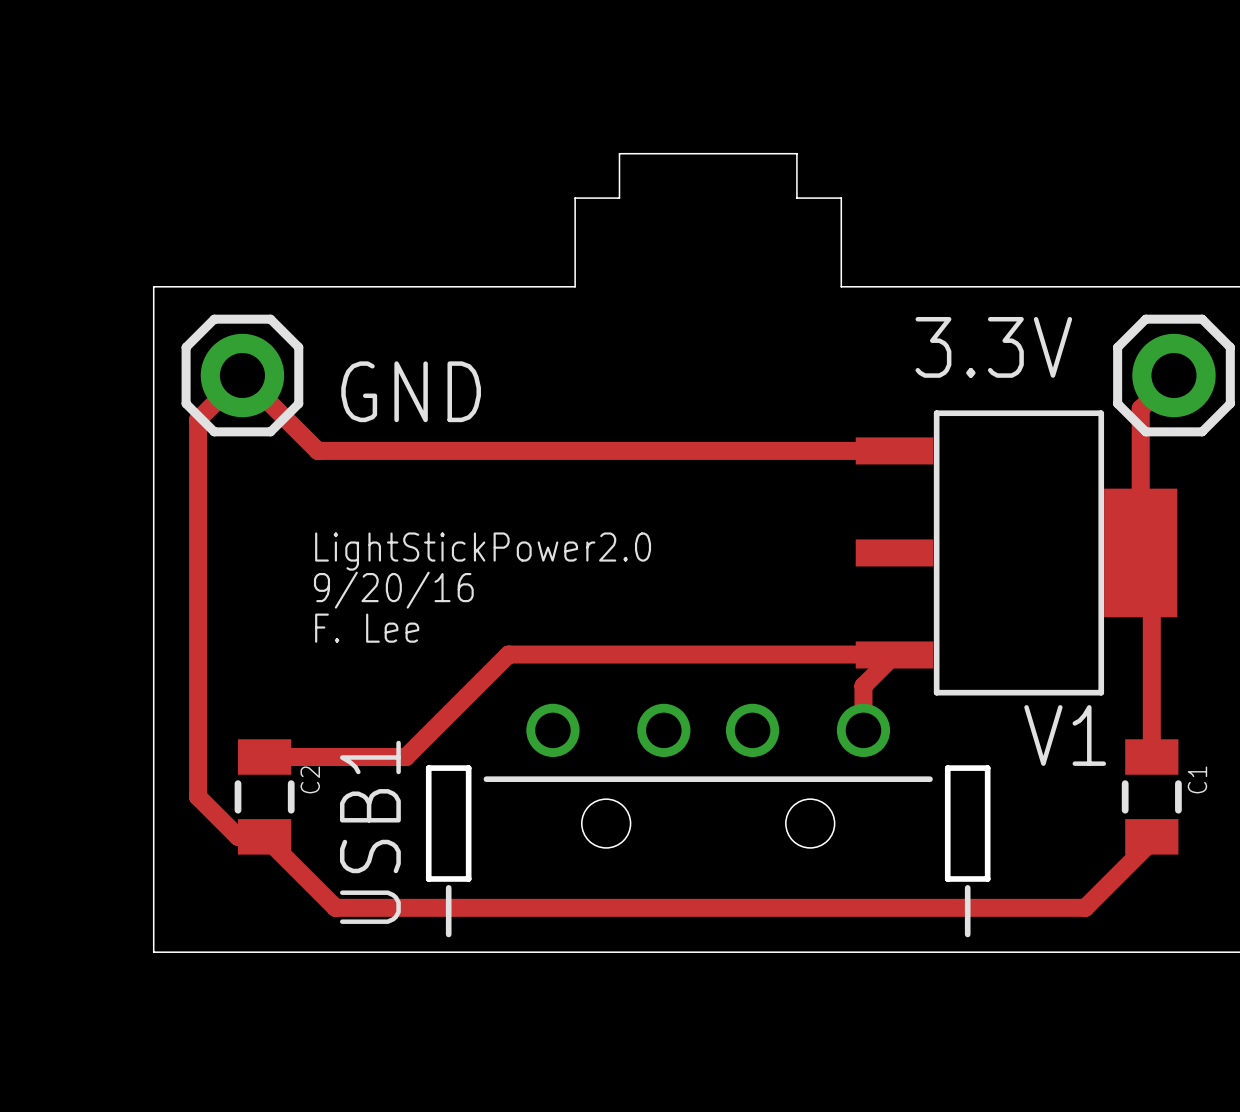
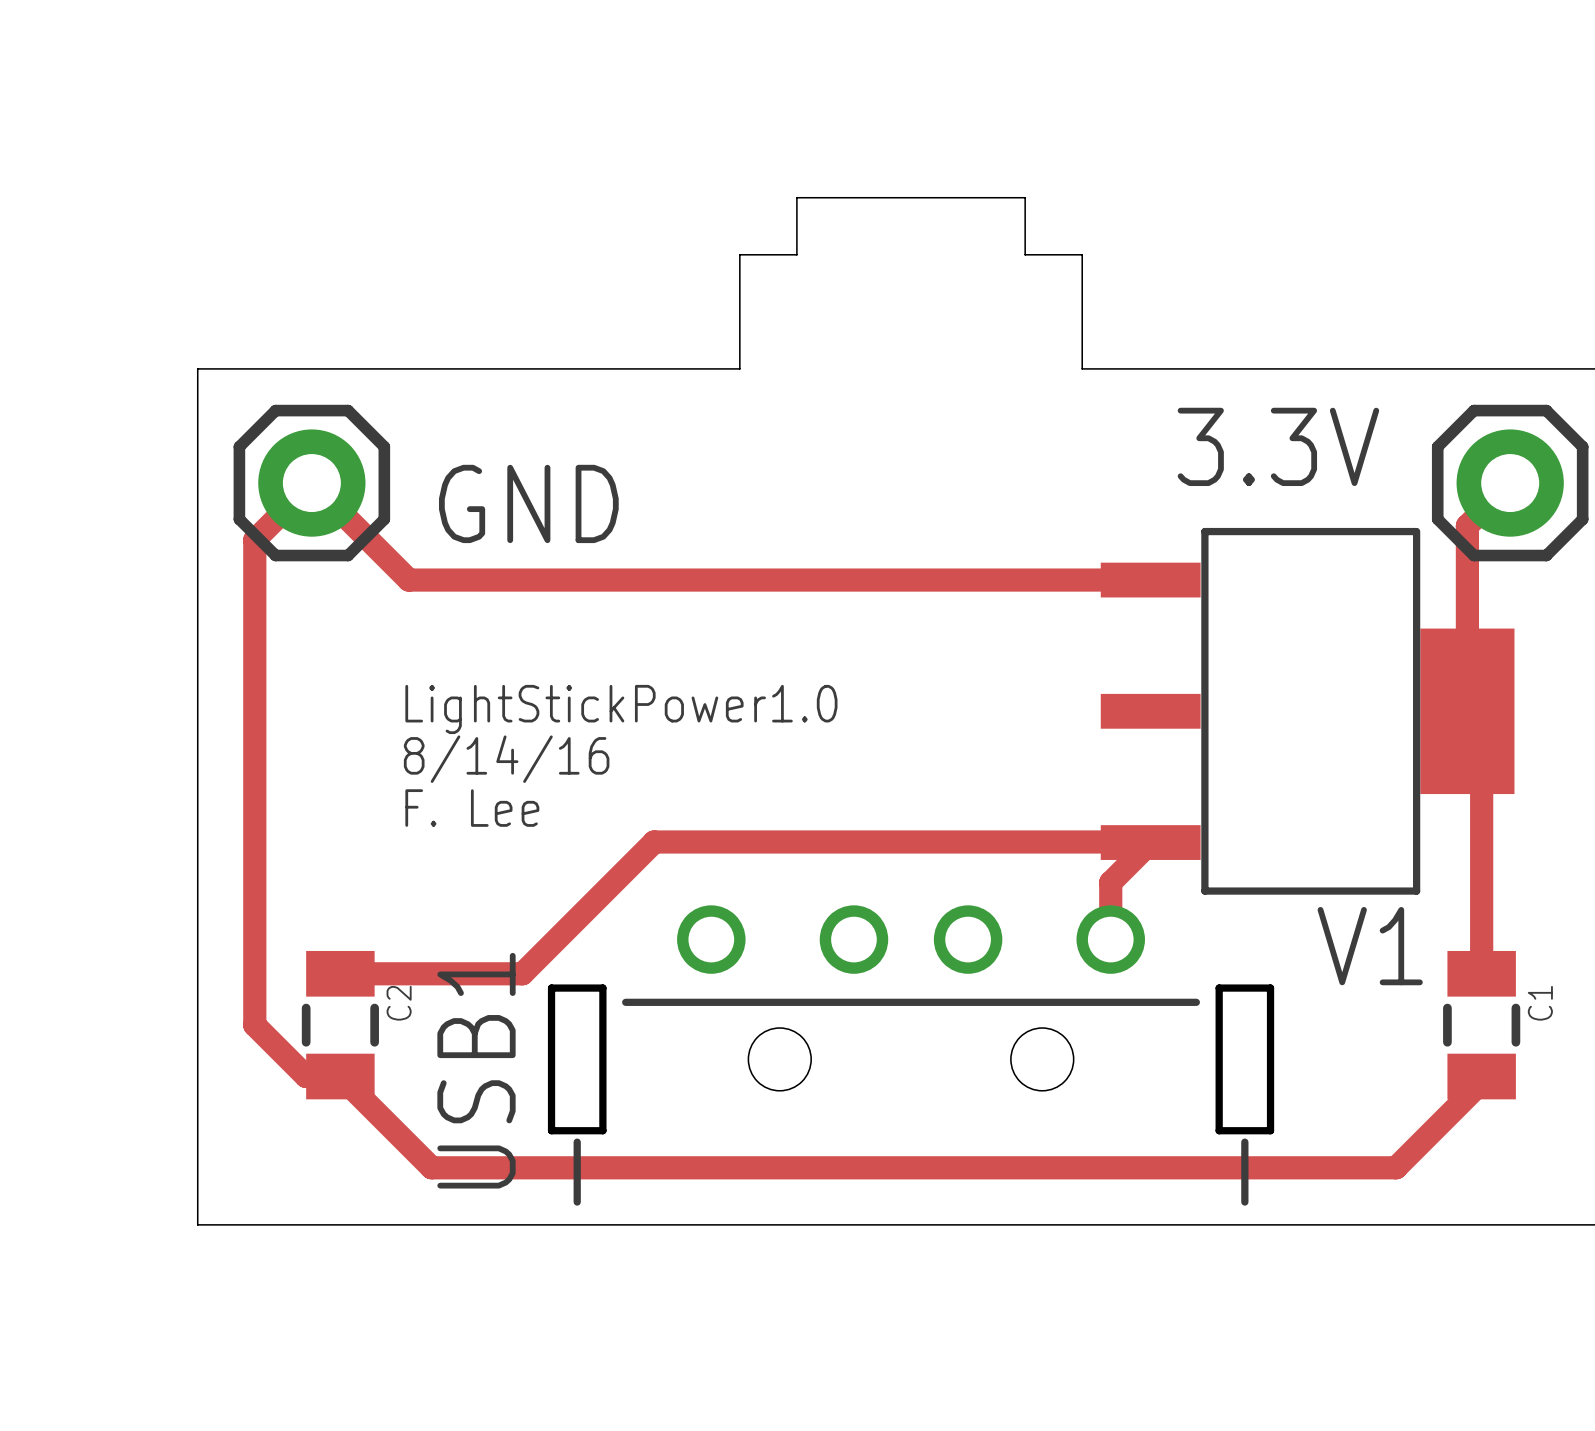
text: LightStickPower2.0 (483, 551) -> LightStickPower1.0 (621, 709)
text: 9/20/16 (393, 590) -> 8/14/16 (506, 759)

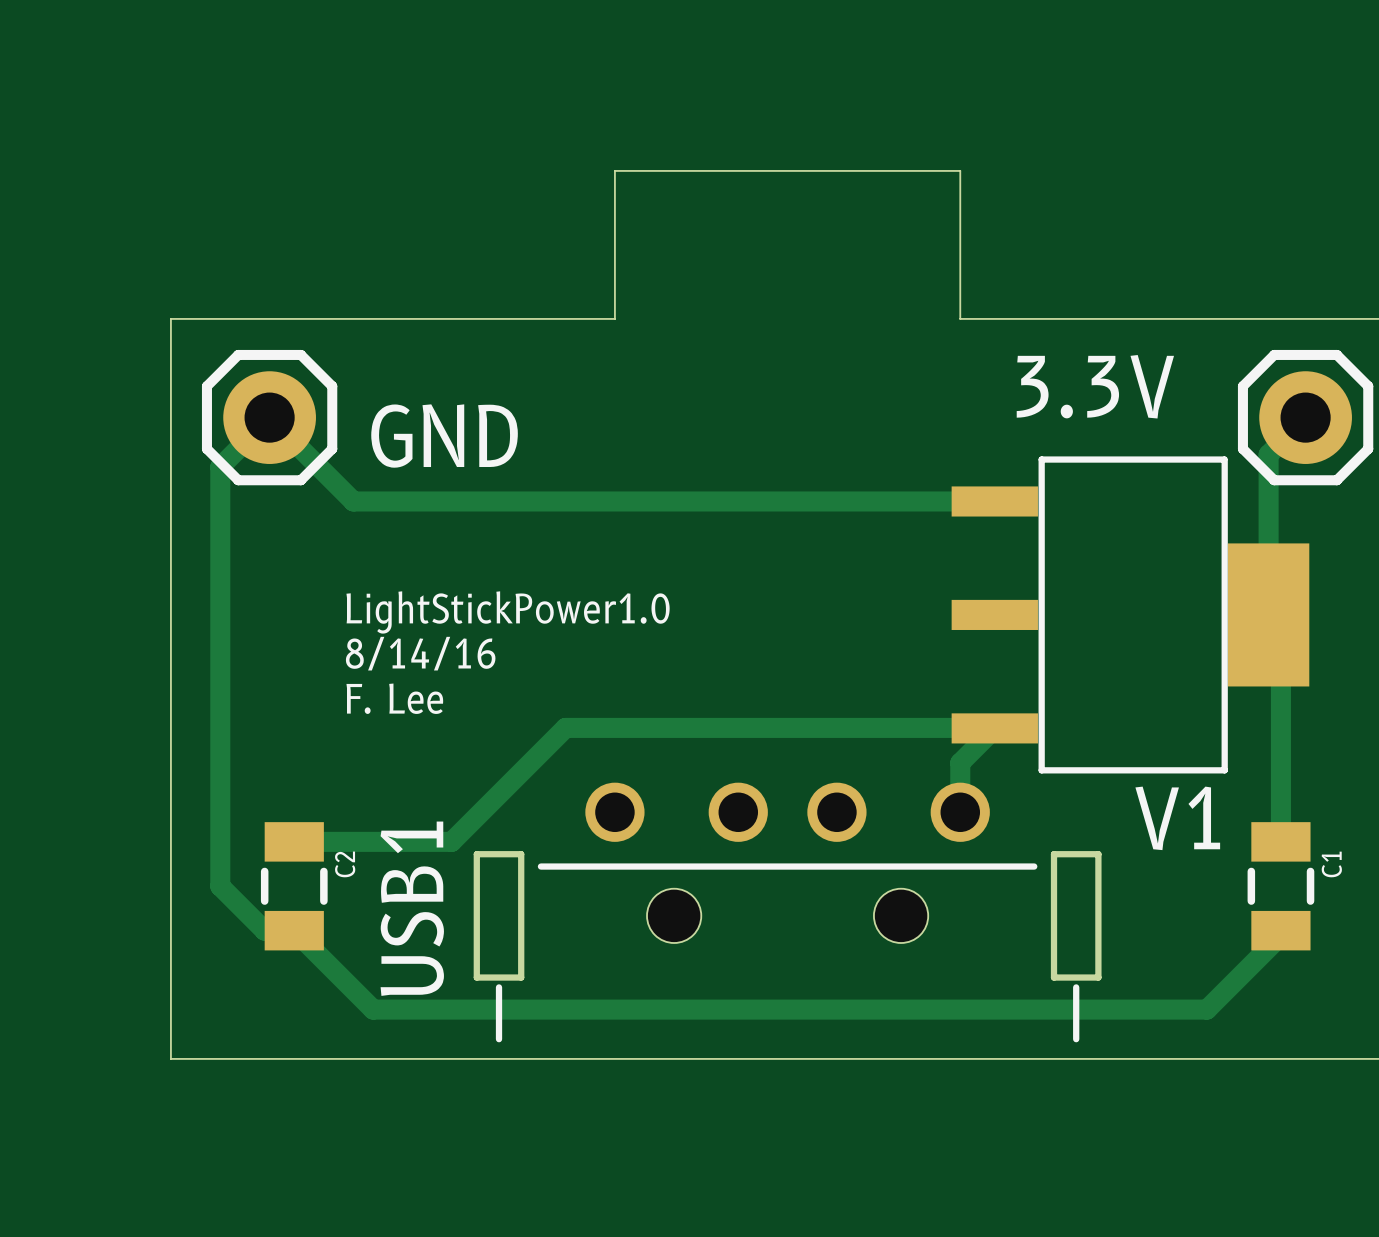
board edge: (796, 197) (796, 254) (739, 254) (739, 368) (711, 368) -> (688, 170) (614, 170) (614, 318)
board edge: (1025, 197) (1025, 254) (1082, 254) (1082, 368) (1110, 368) -> (886, 170) (960, 170) (960, 318)

